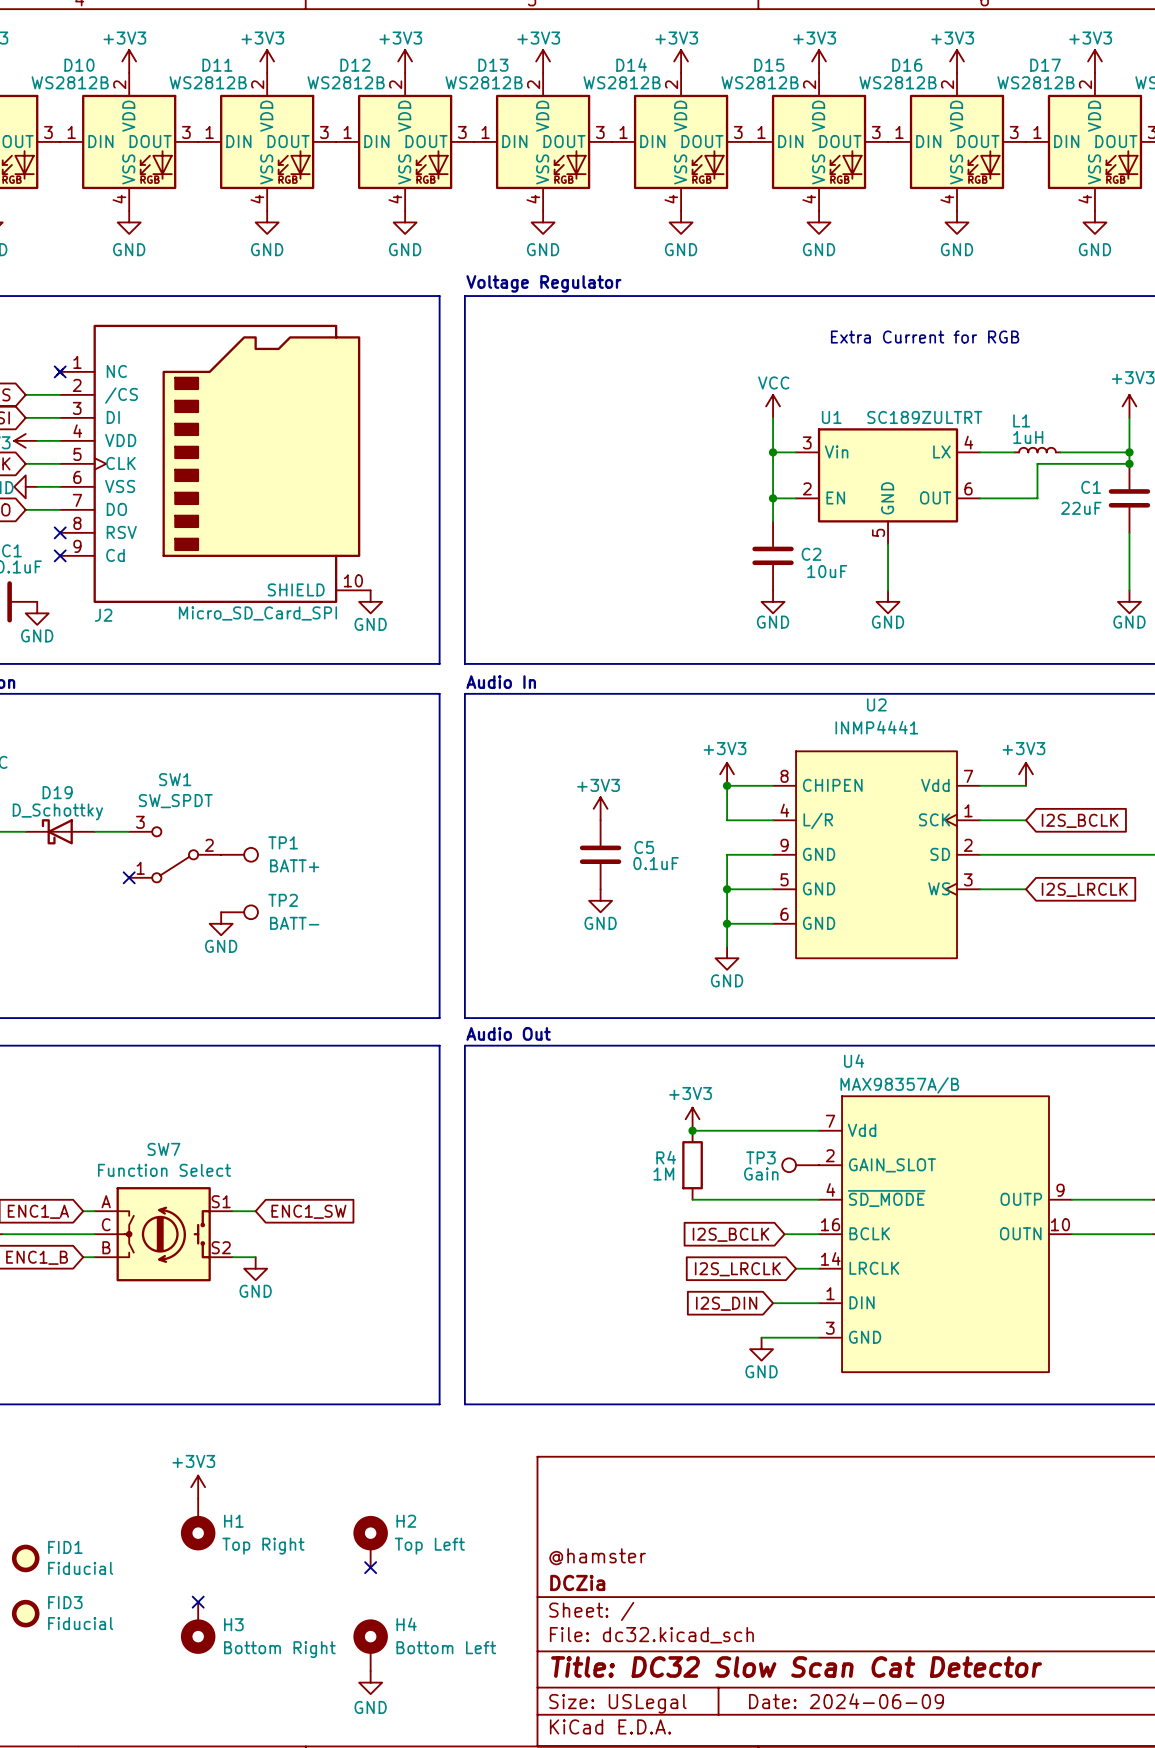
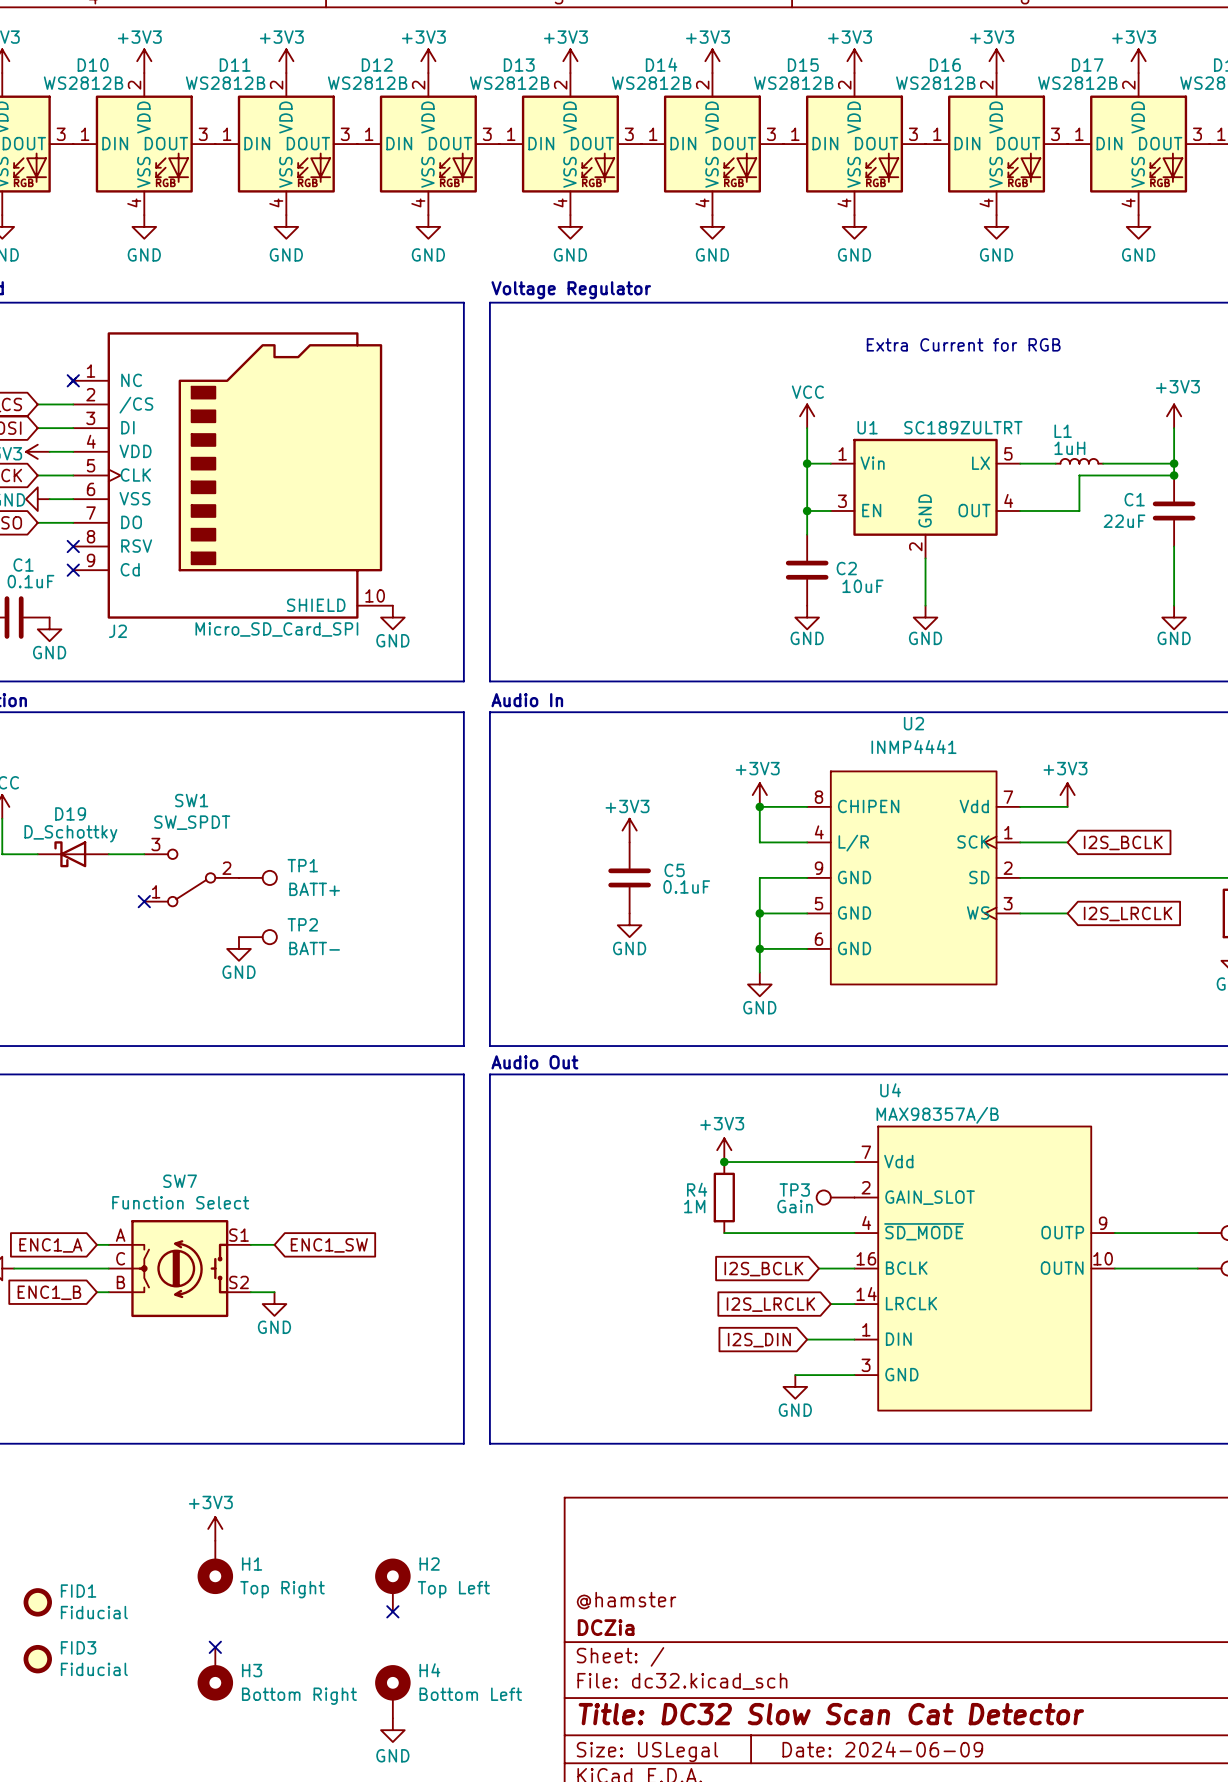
U1 pin number: 3 (807, 442) -> 1 (842, 453)
U1 pin number: 4 (968, 442) -> 5 (1008, 453)
U1 pin number: 2 (807, 488) -> 3 (842, 501)
U1 pin number: 6 (968, 488) -> 4 (1008, 500)
U1 pin number: 5 (878, 532) -> 2 (915, 546)

